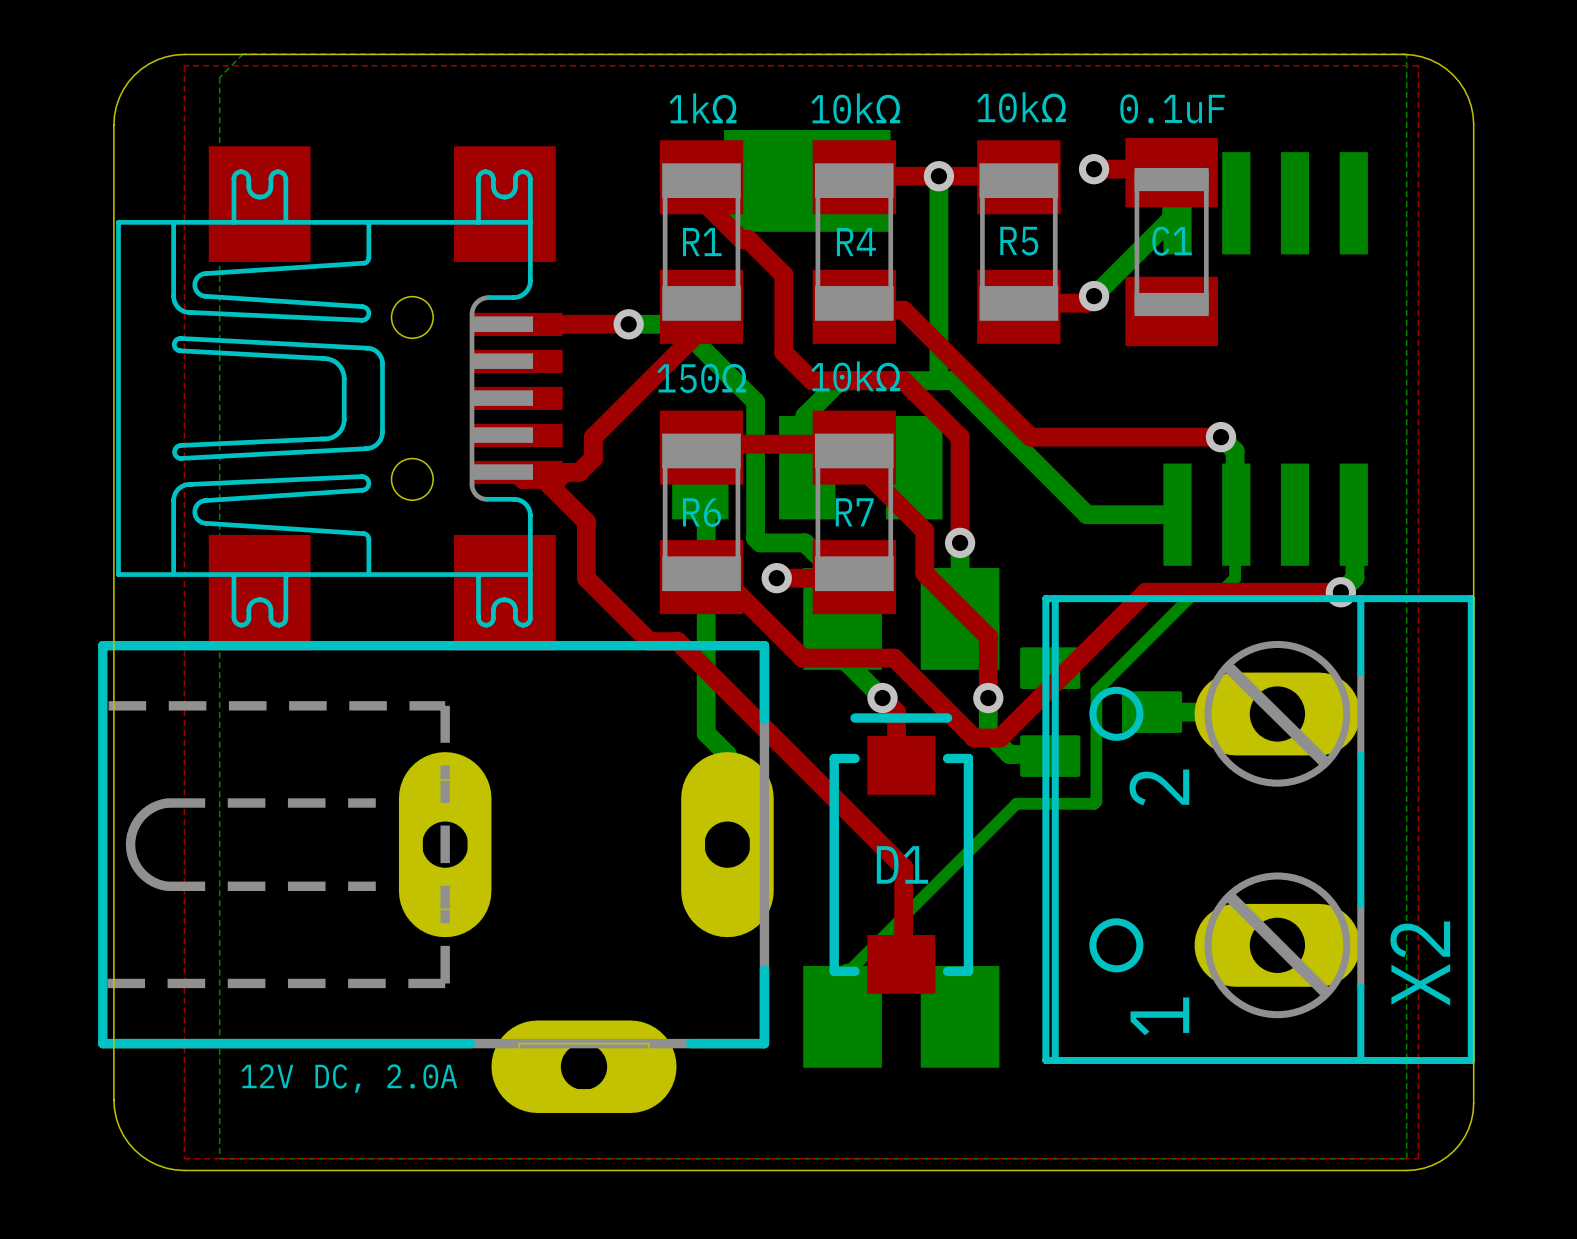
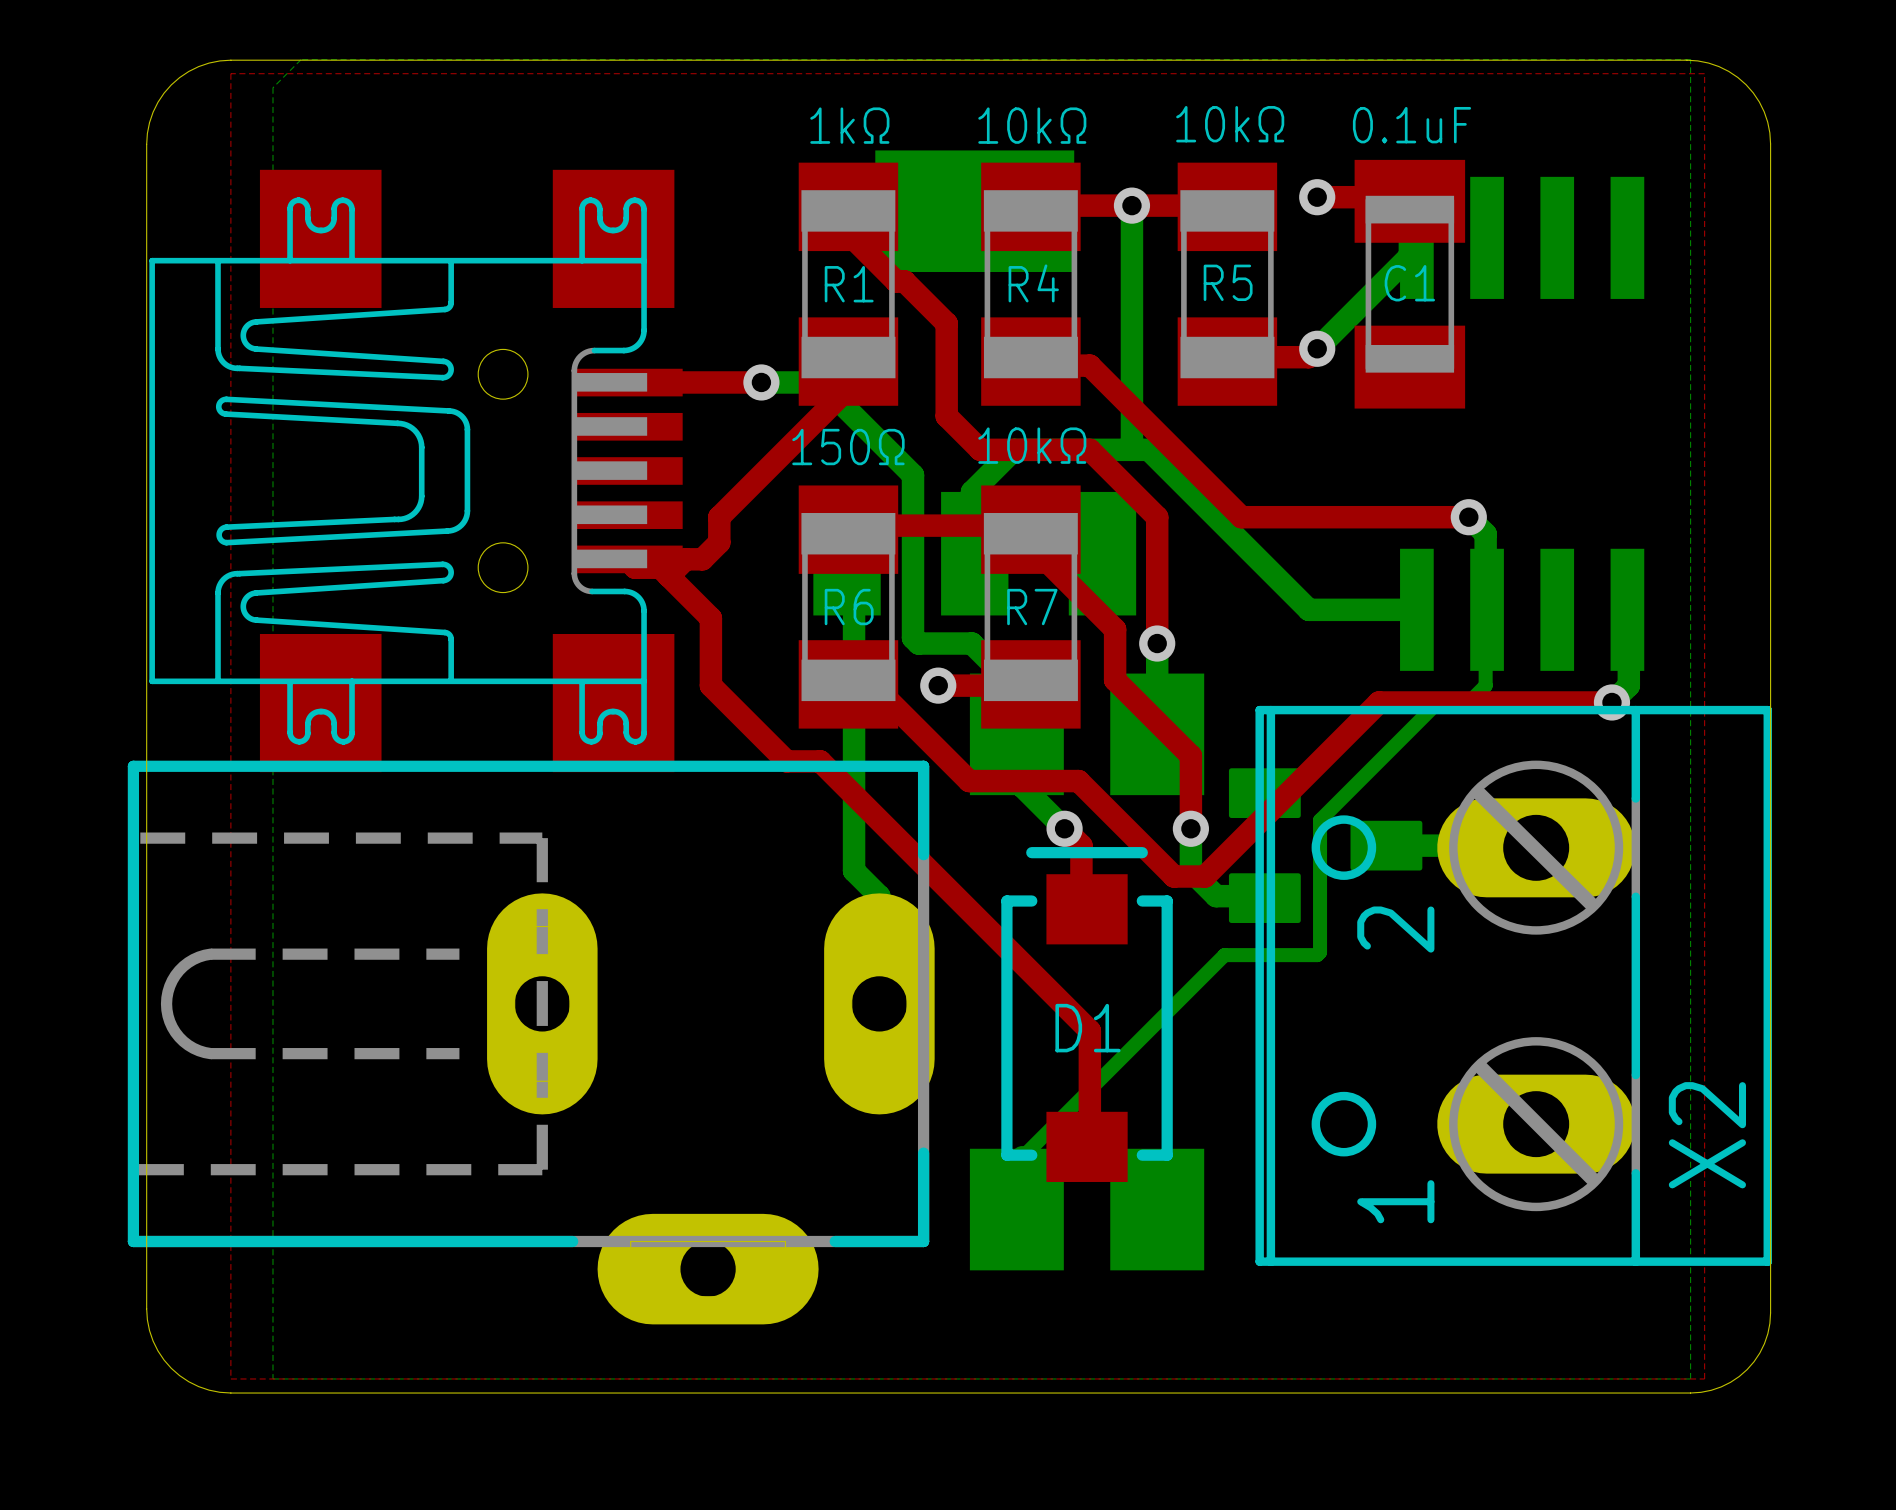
text: 12V DC, 2.0A (349, 1078) -> none

